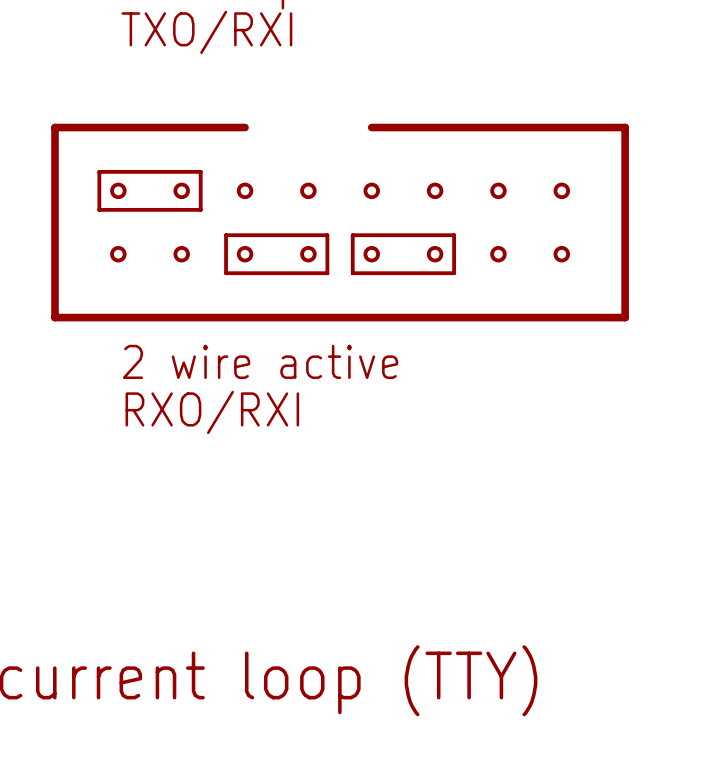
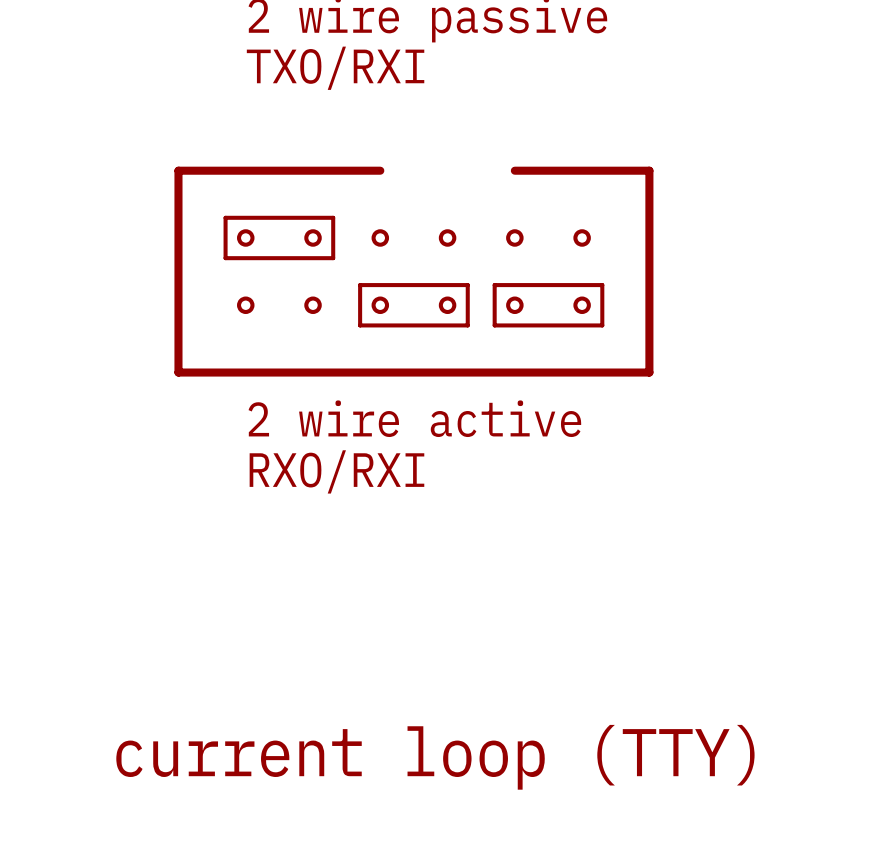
line: (498, 127) (625, 127) (625, 317) (498, 317) -> (649, 170) (649, 372)
drawing: [490, 182, 507, 200] -> none
drawing: [553, 182, 571, 200] -> none
drawing: [490, 245, 507, 263] -> none
drawing: [553, 245, 571, 263] -> none

